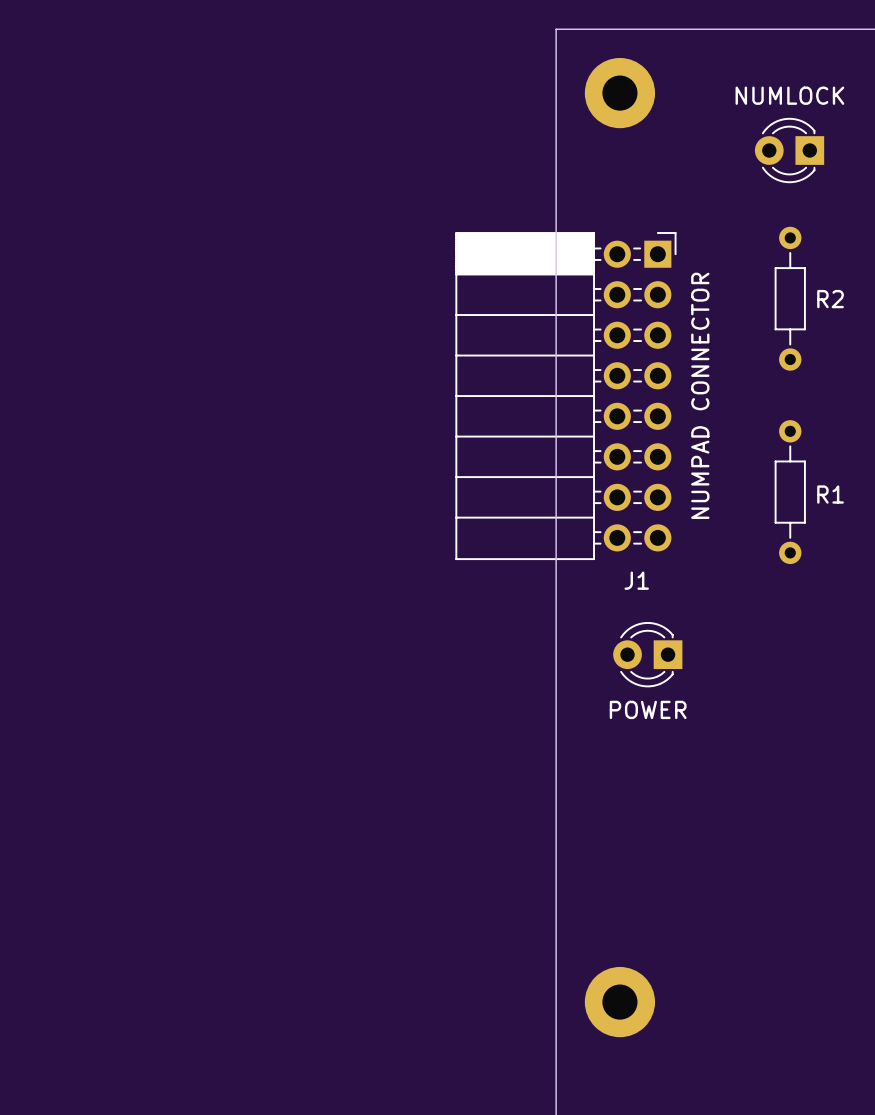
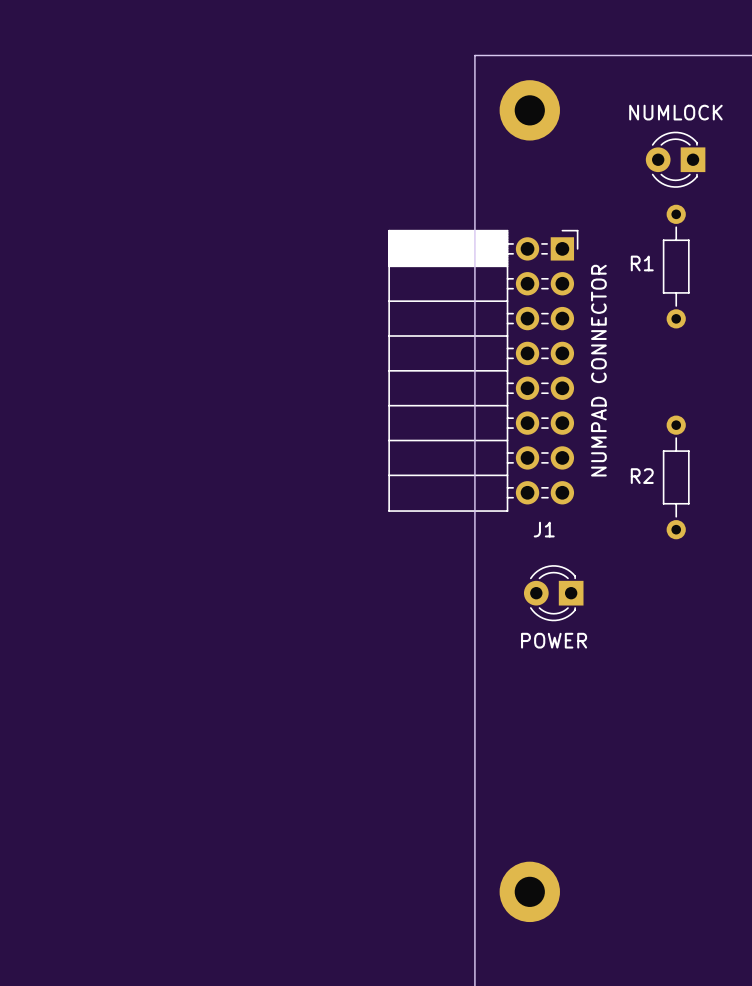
R2 position: (790, 298) -> (676, 477)
R2 name position: R2 (830, 299) -> R2 (642, 476)
R1 position: (790, 492) -> (676, 266)
R1 name position: R1 (830, 494) -> R1 (642, 263)

